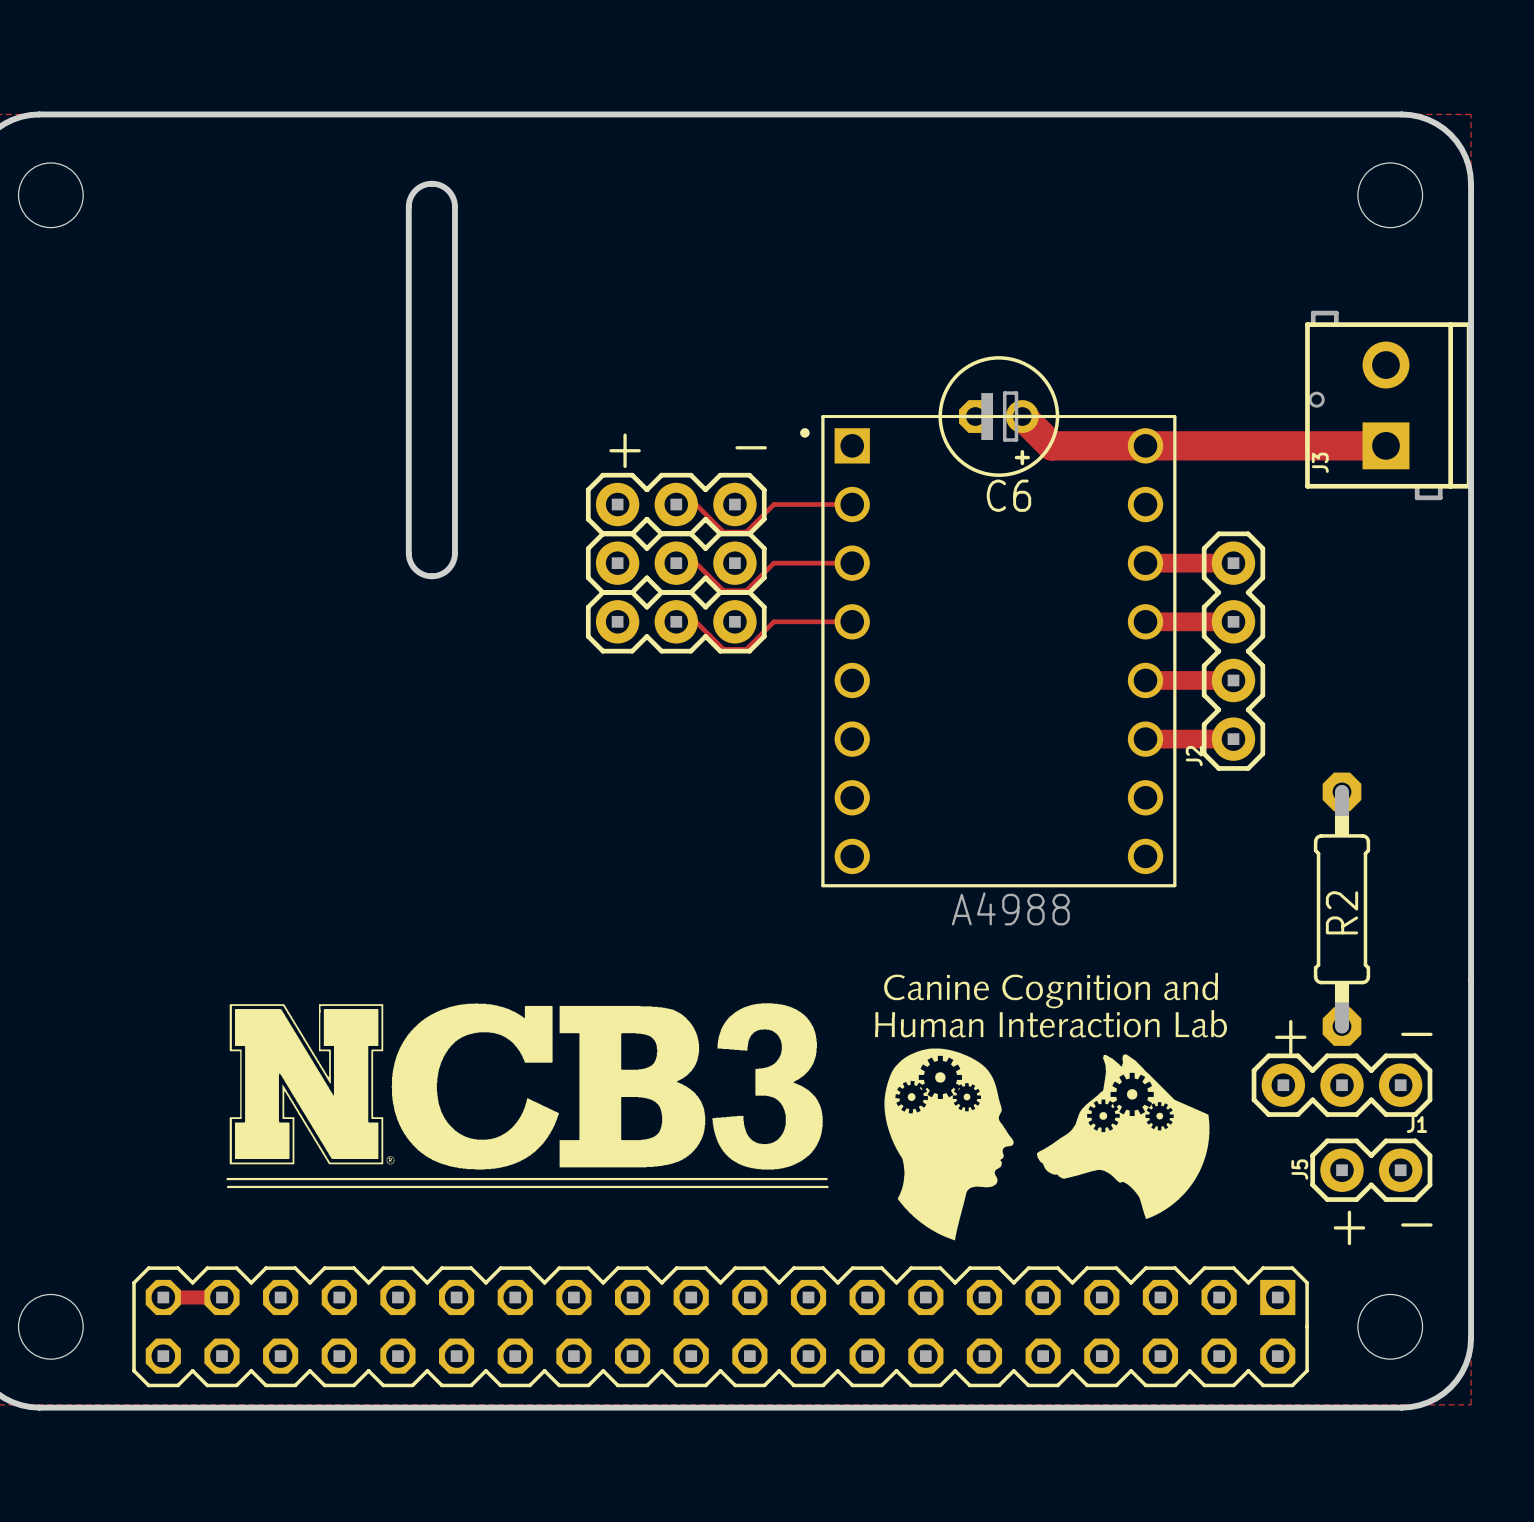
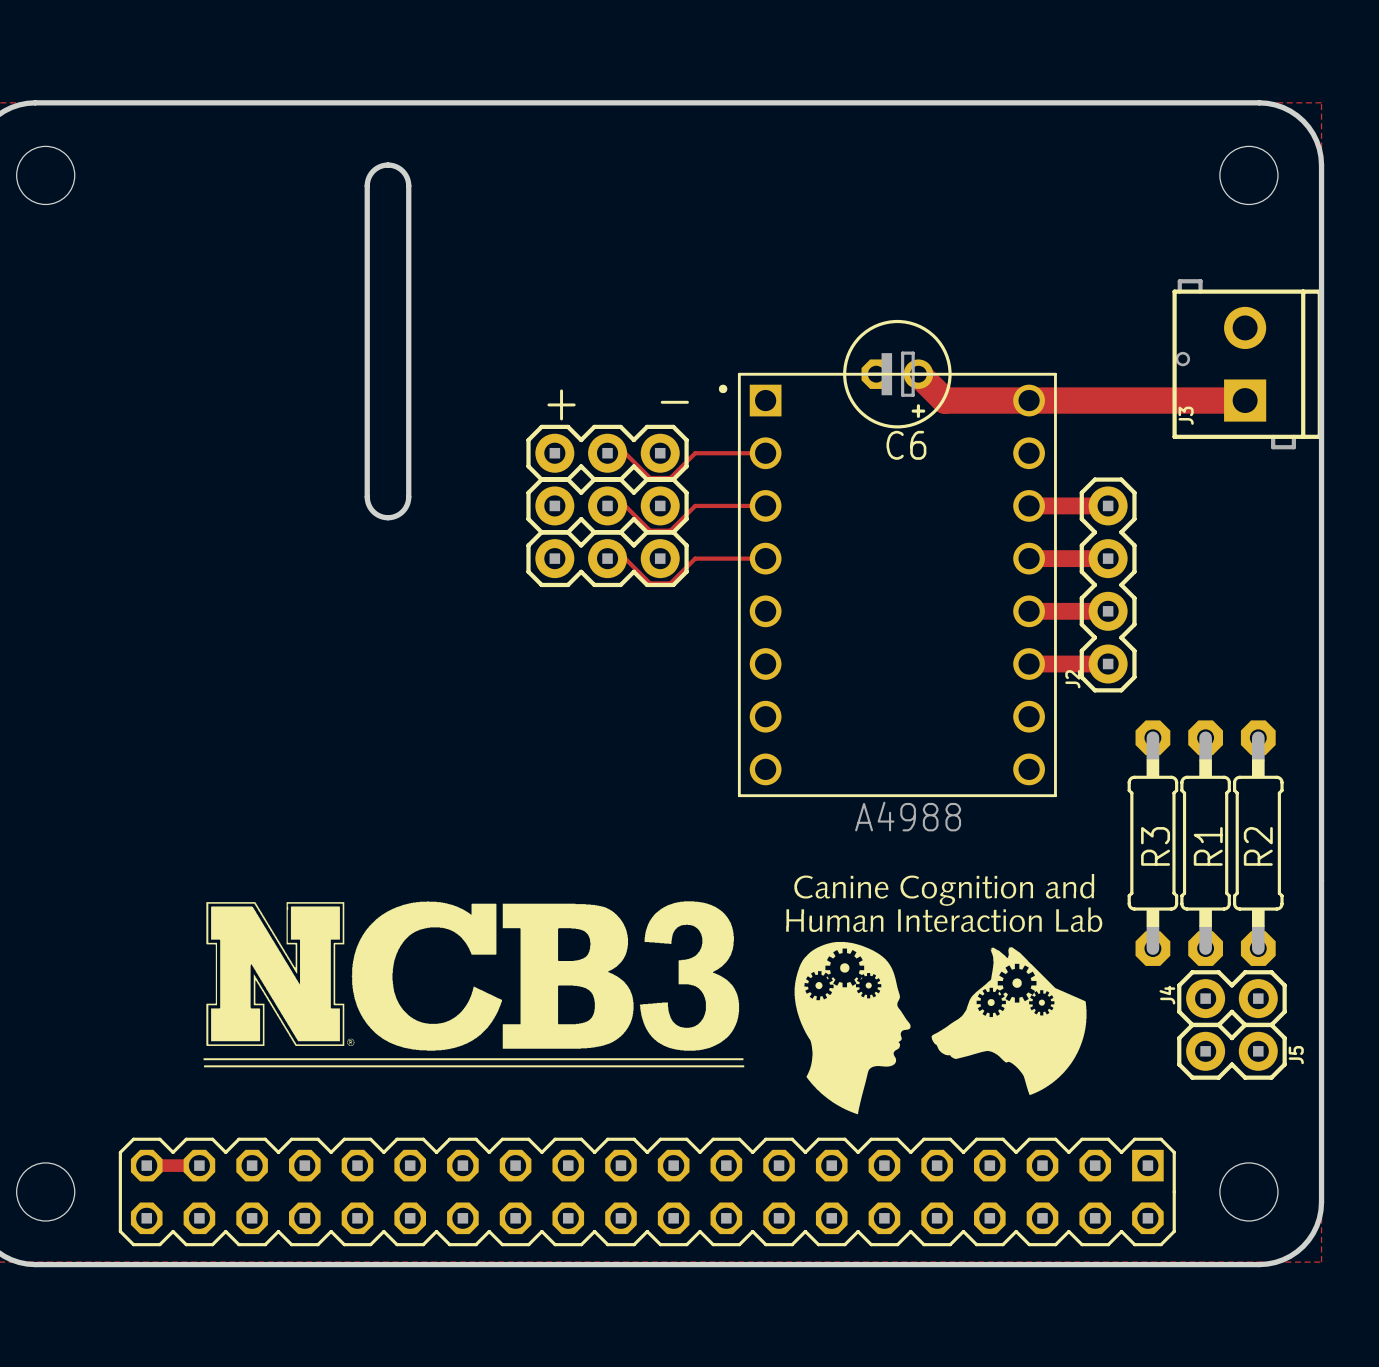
R2 position: (1342, 909) -> (1258, 843)
R3: none -> (1152, 843)
R1: none -> (1205, 843)
text: - (1416, 1034) -> none
text: + (1290, 1037) -> none
J1: (1342, 1085) -> none
J4: none -> (1231, 998)
J5 name position: J5 (1299, 1169) -> J5 (1296, 1055)
text: - (1416, 1224) -> none
text: + (1349, 1227) -> none

